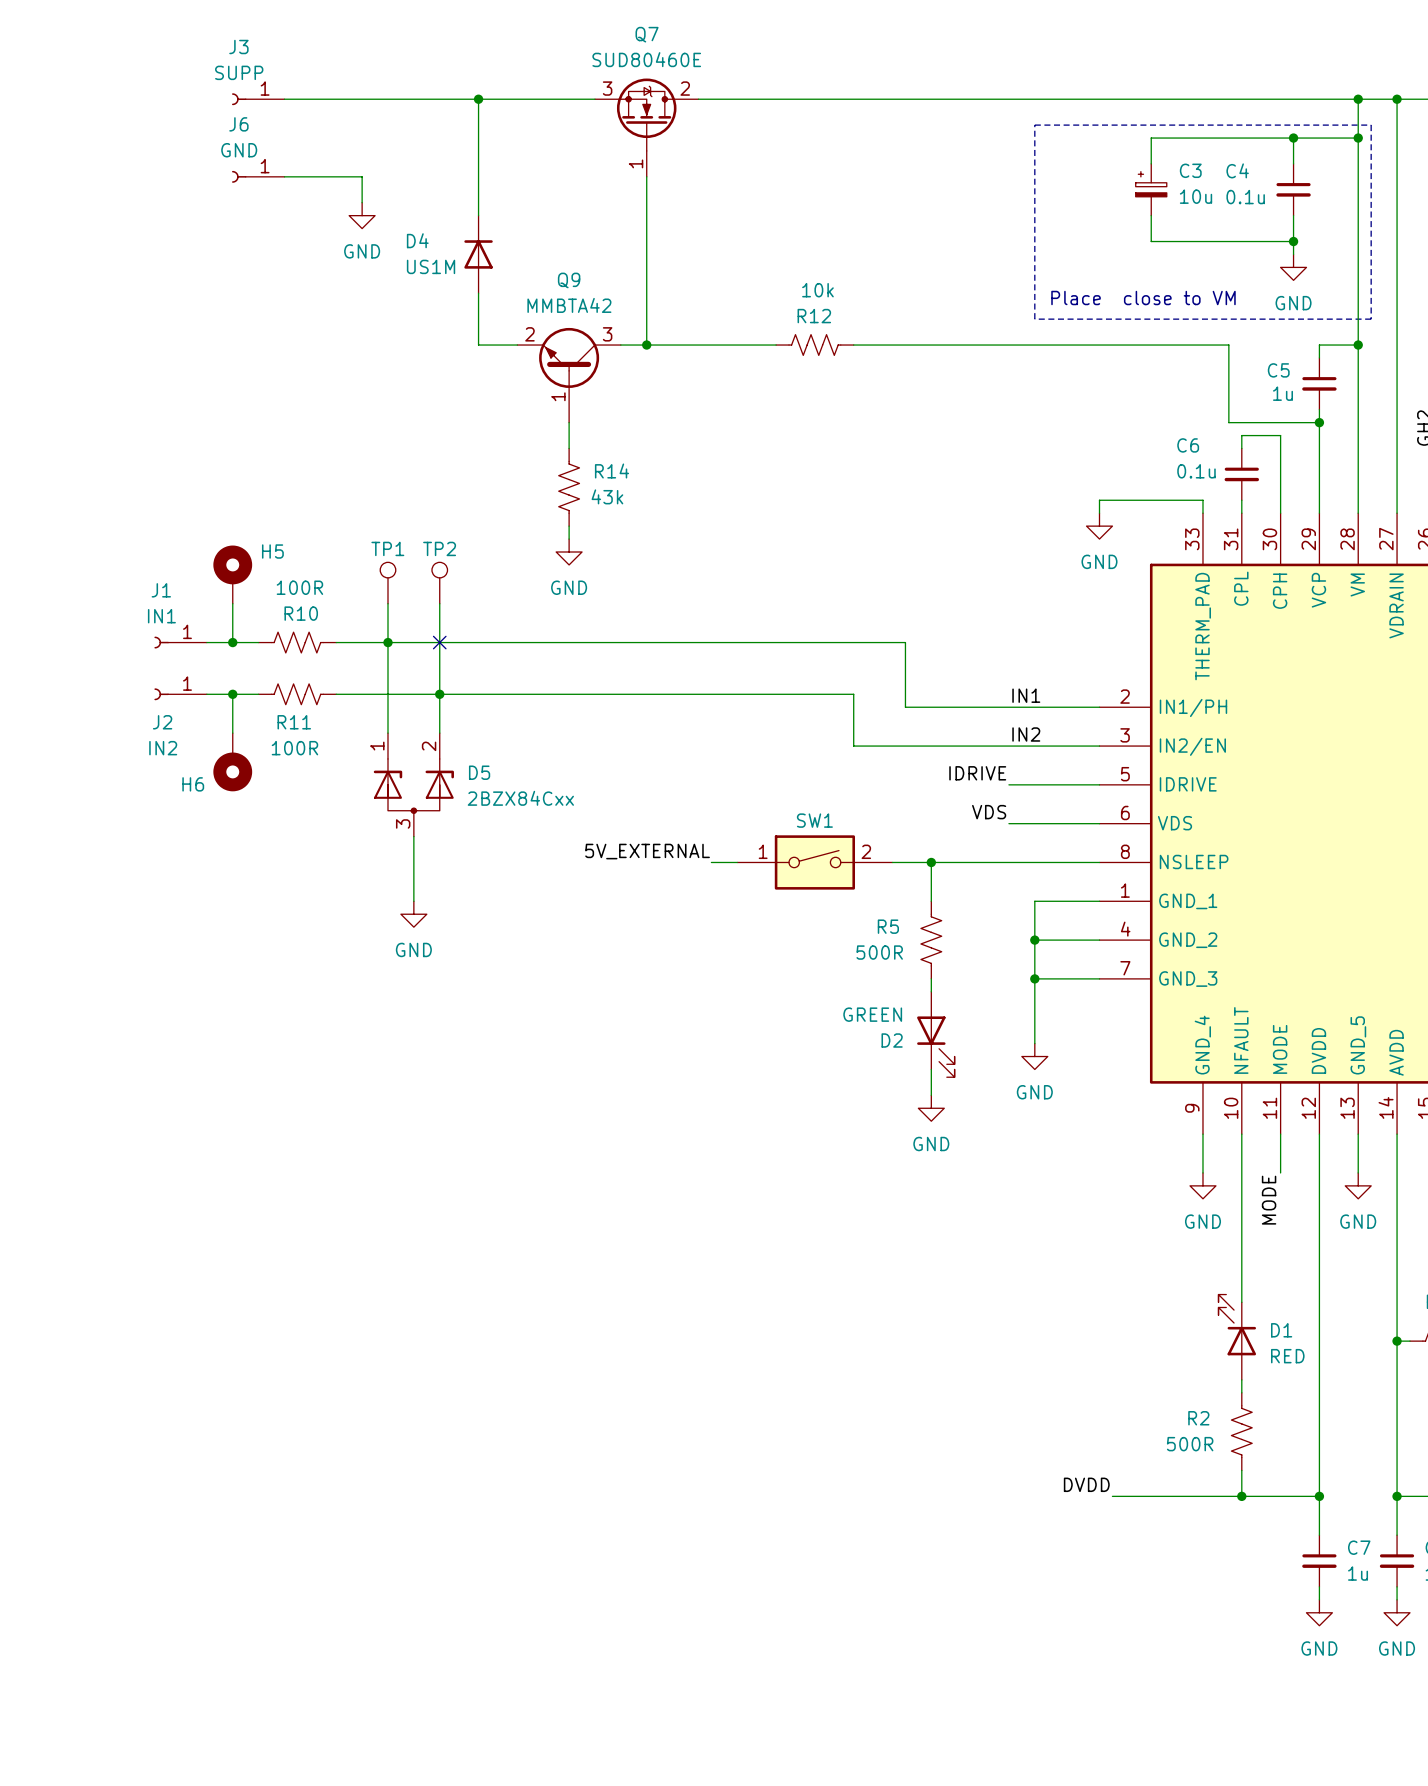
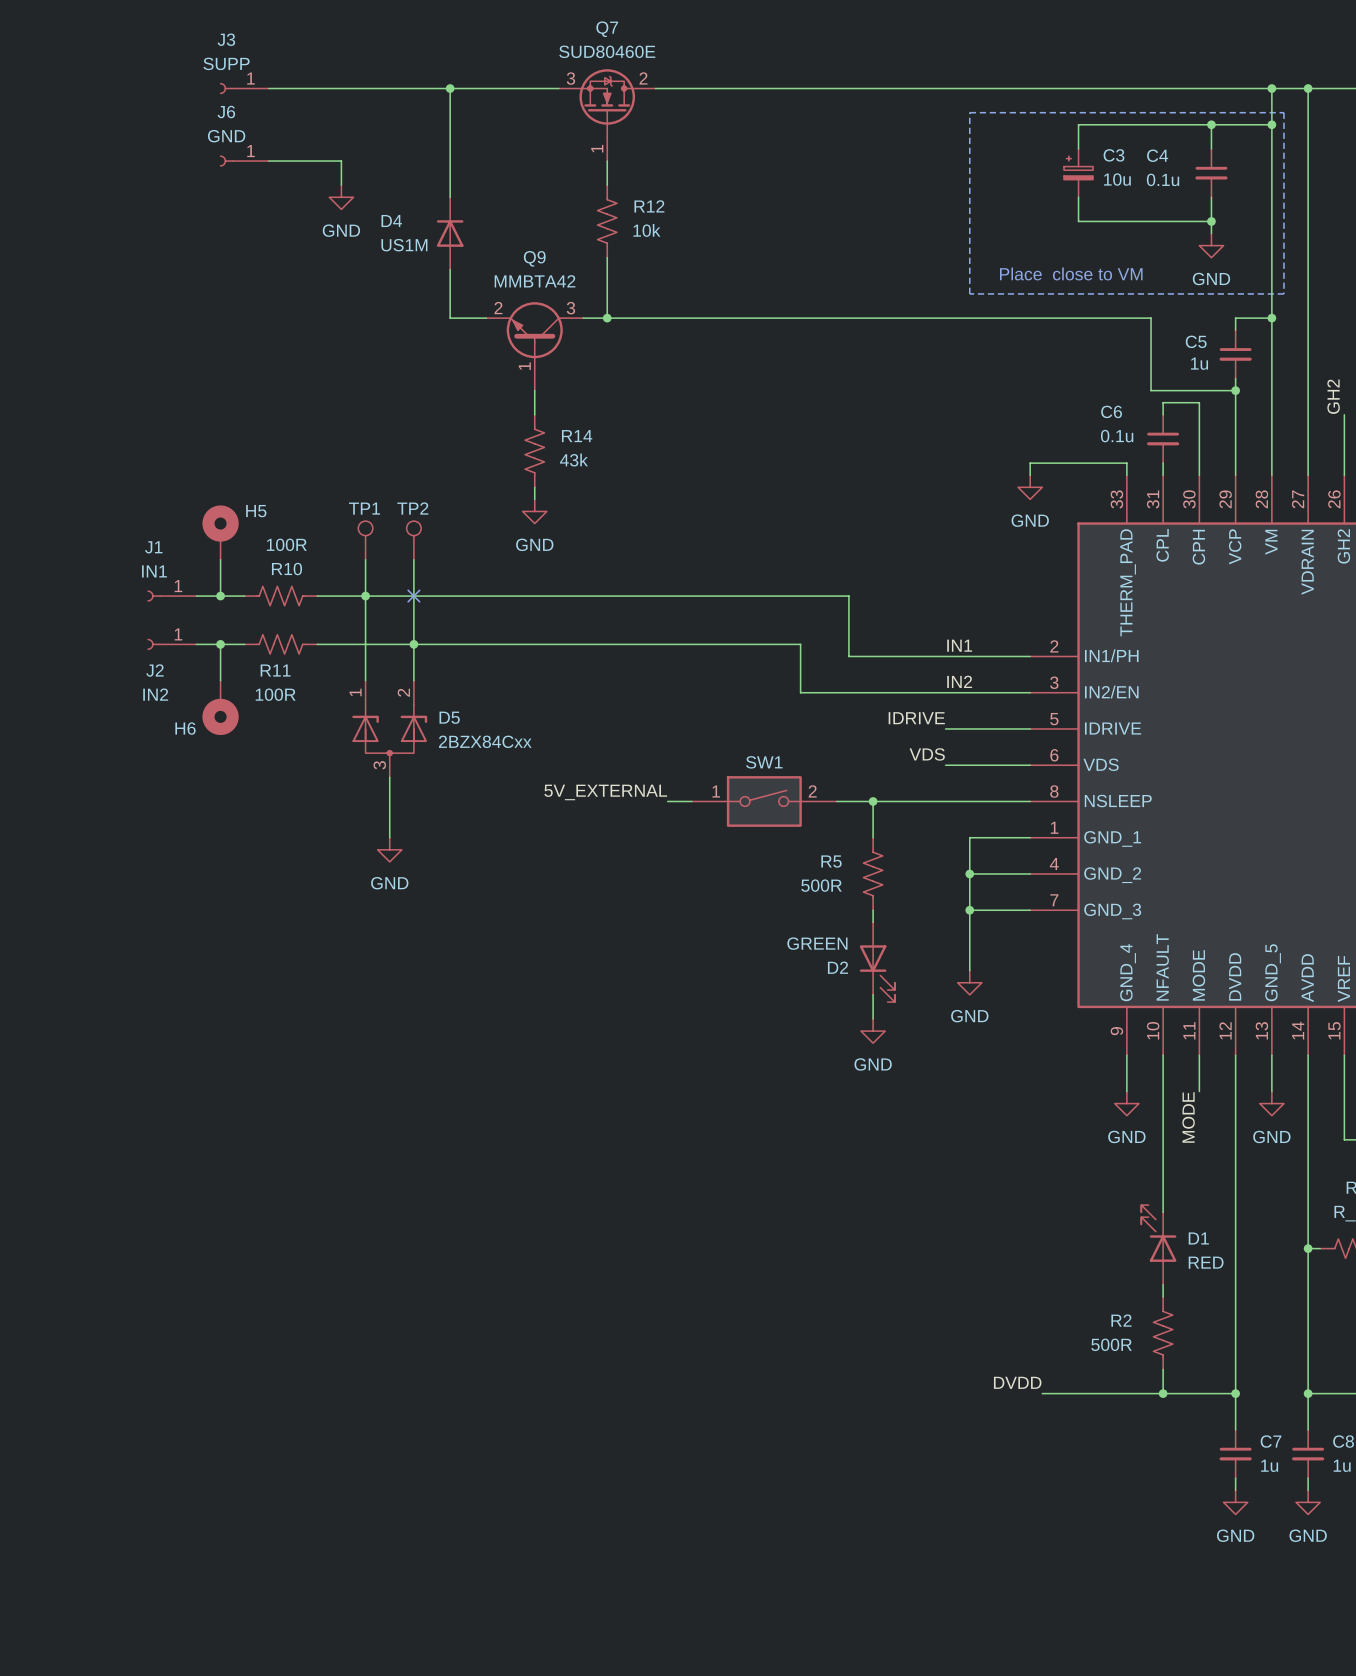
R12 name position: R12 (814, 316) -> R12 (649, 206)
R12 rotation: 0° (814, 345) -> 90° clockwise (607, 221)
R12 position: (814, 345) -> (607, 221)

